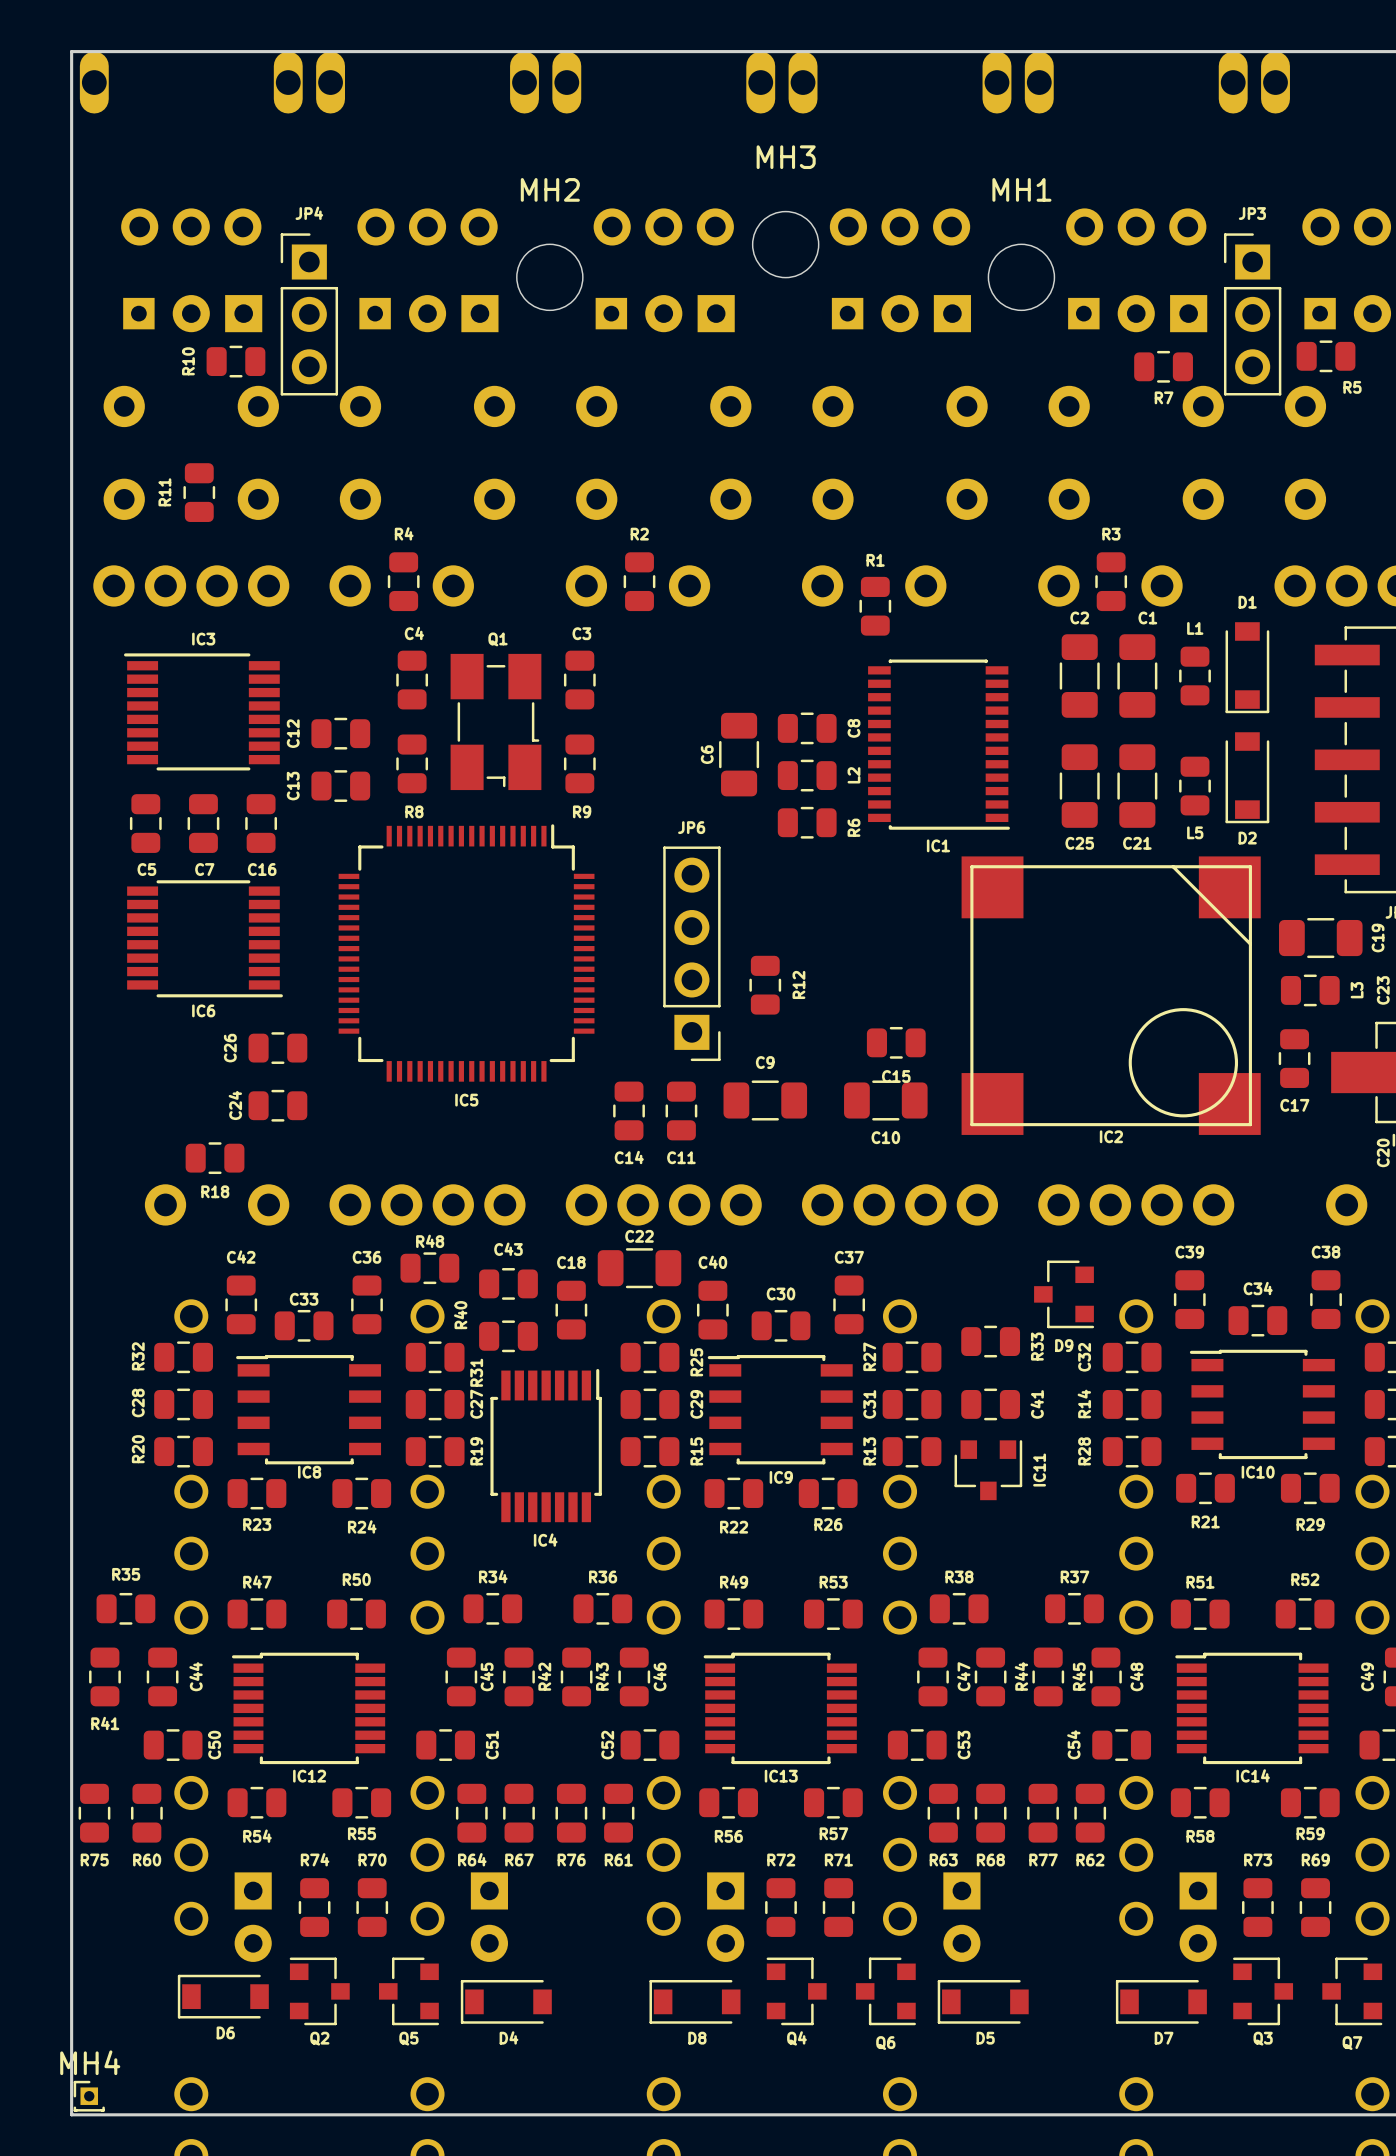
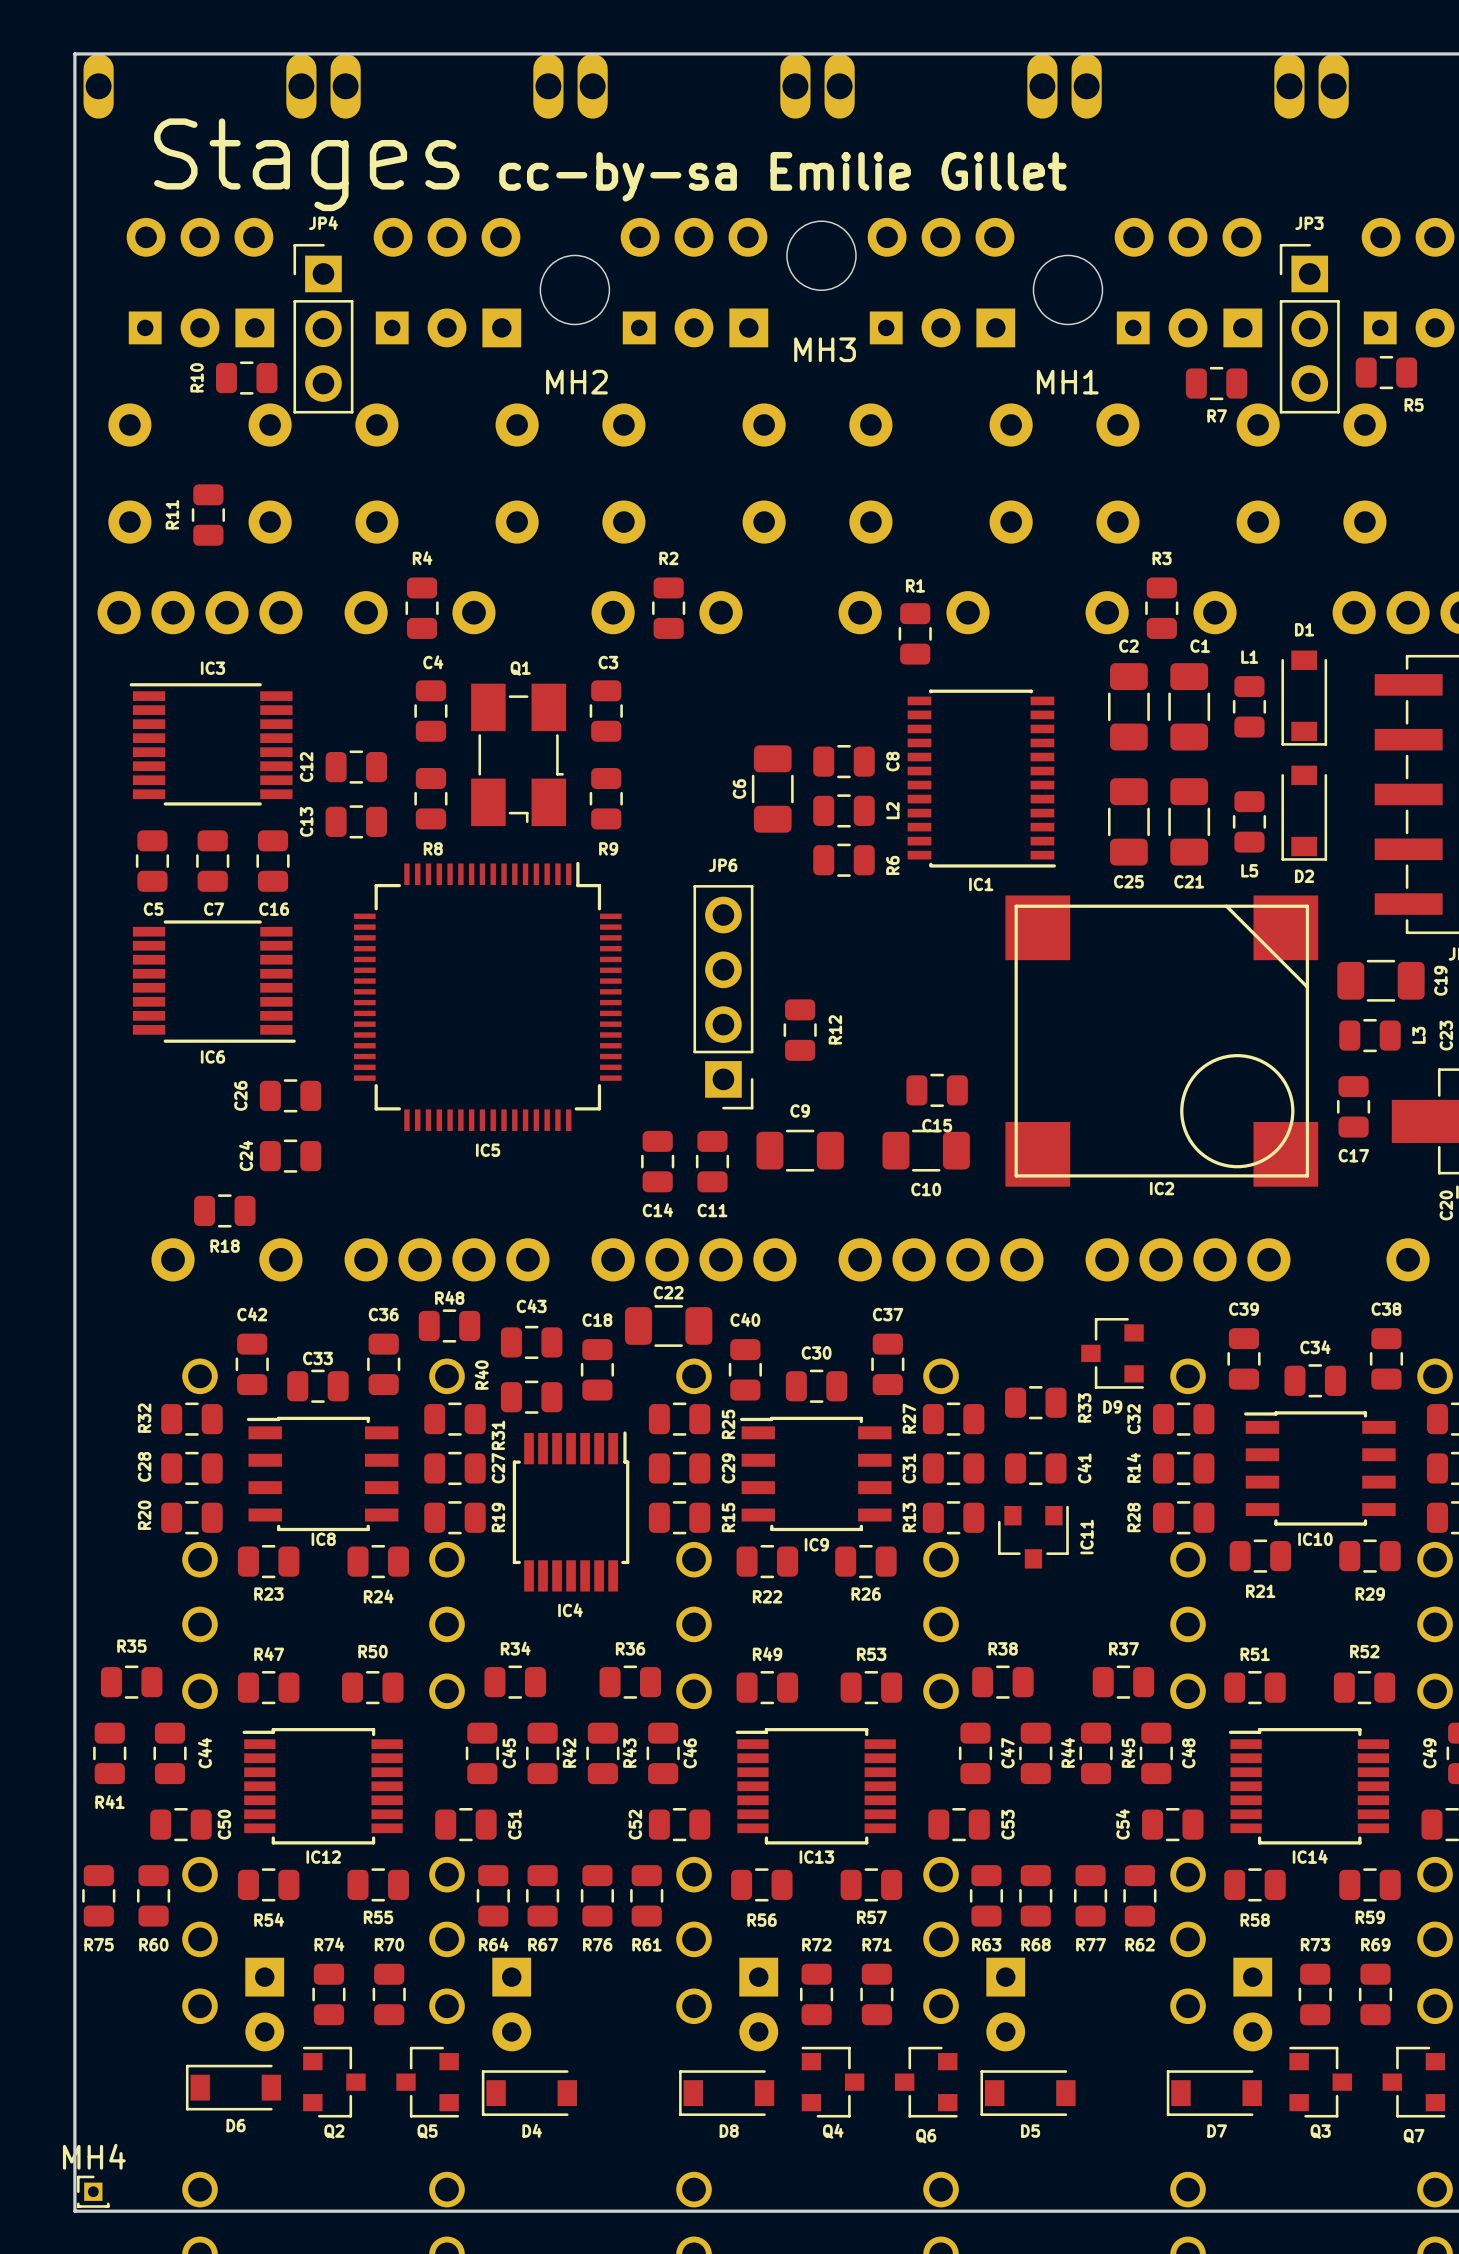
text: none -> Stages (306, 164)
MH3 name position: MH3 (786, 157) -> MH3 (825, 349)
text: none -> cc-by-sa Emilie Gillet (782, 176)
MH2 name position: MH2 (550, 189) -> MH2 (576, 382)
MH1 name position: MH1 (1021, 189) -> MH1 (1067, 382)

